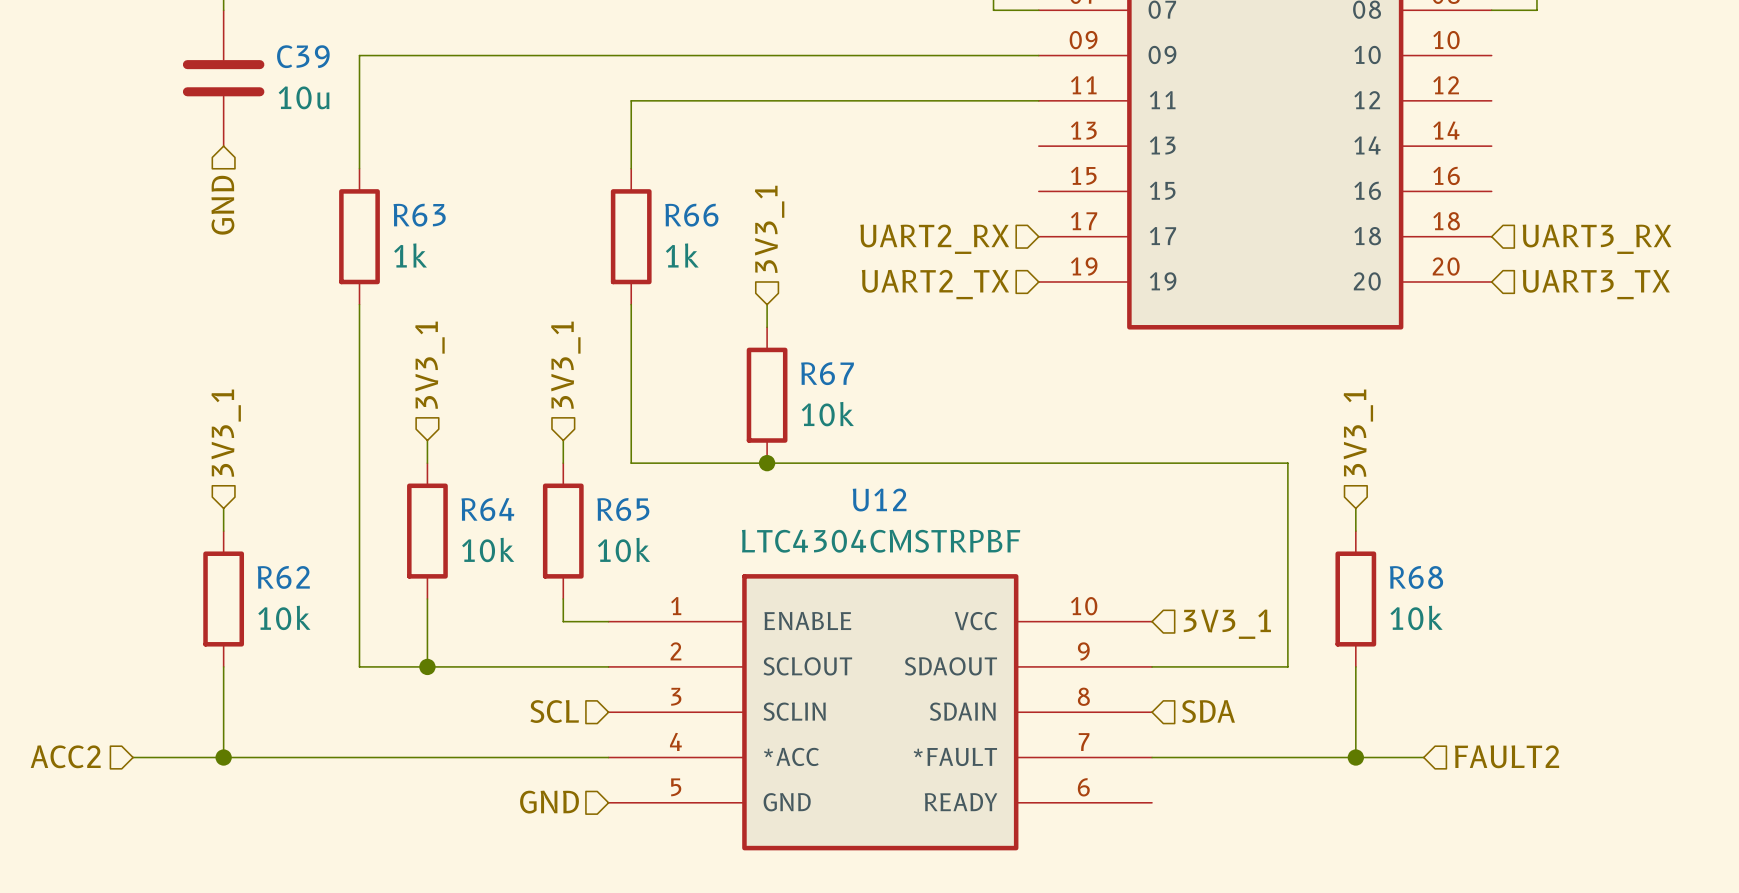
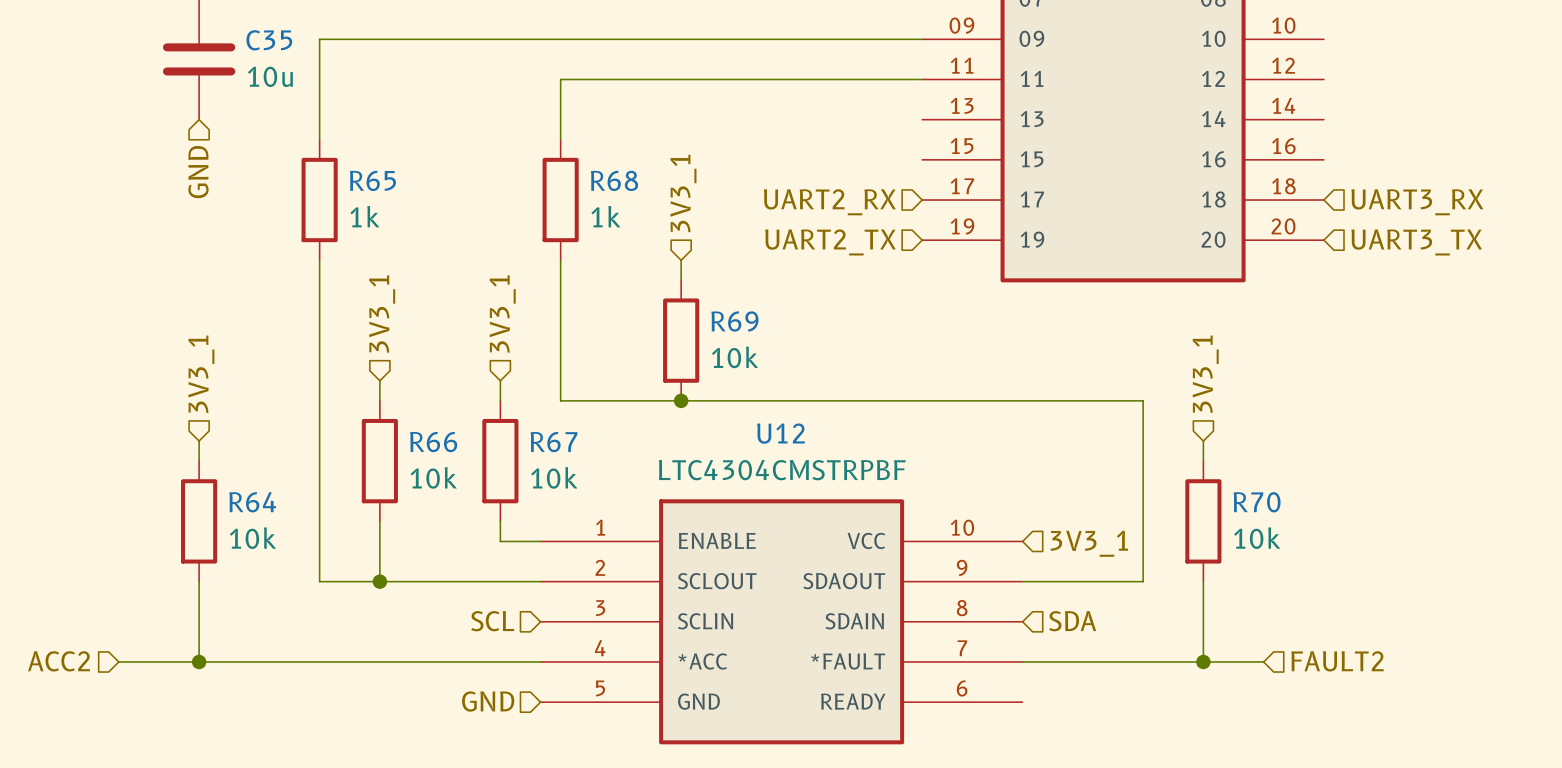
C39 name: C39 (303, 56) -> C35 (269, 40)
R63 name: R63 (419, 215) -> R65 (372, 180)
R66 name: R66 (691, 215) -> R68 (614, 180)
R67 name: R67 (827, 373) -> R69 (734, 321)
R64 name: R64 (487, 509) -> R66 (433, 442)
R65 name: R65 (623, 509) -> R67 (553, 442)
R62 name: R62 (283, 577) -> R64 (252, 502)
R68 name: R68 (1416, 577) -> R70 (1257, 502)

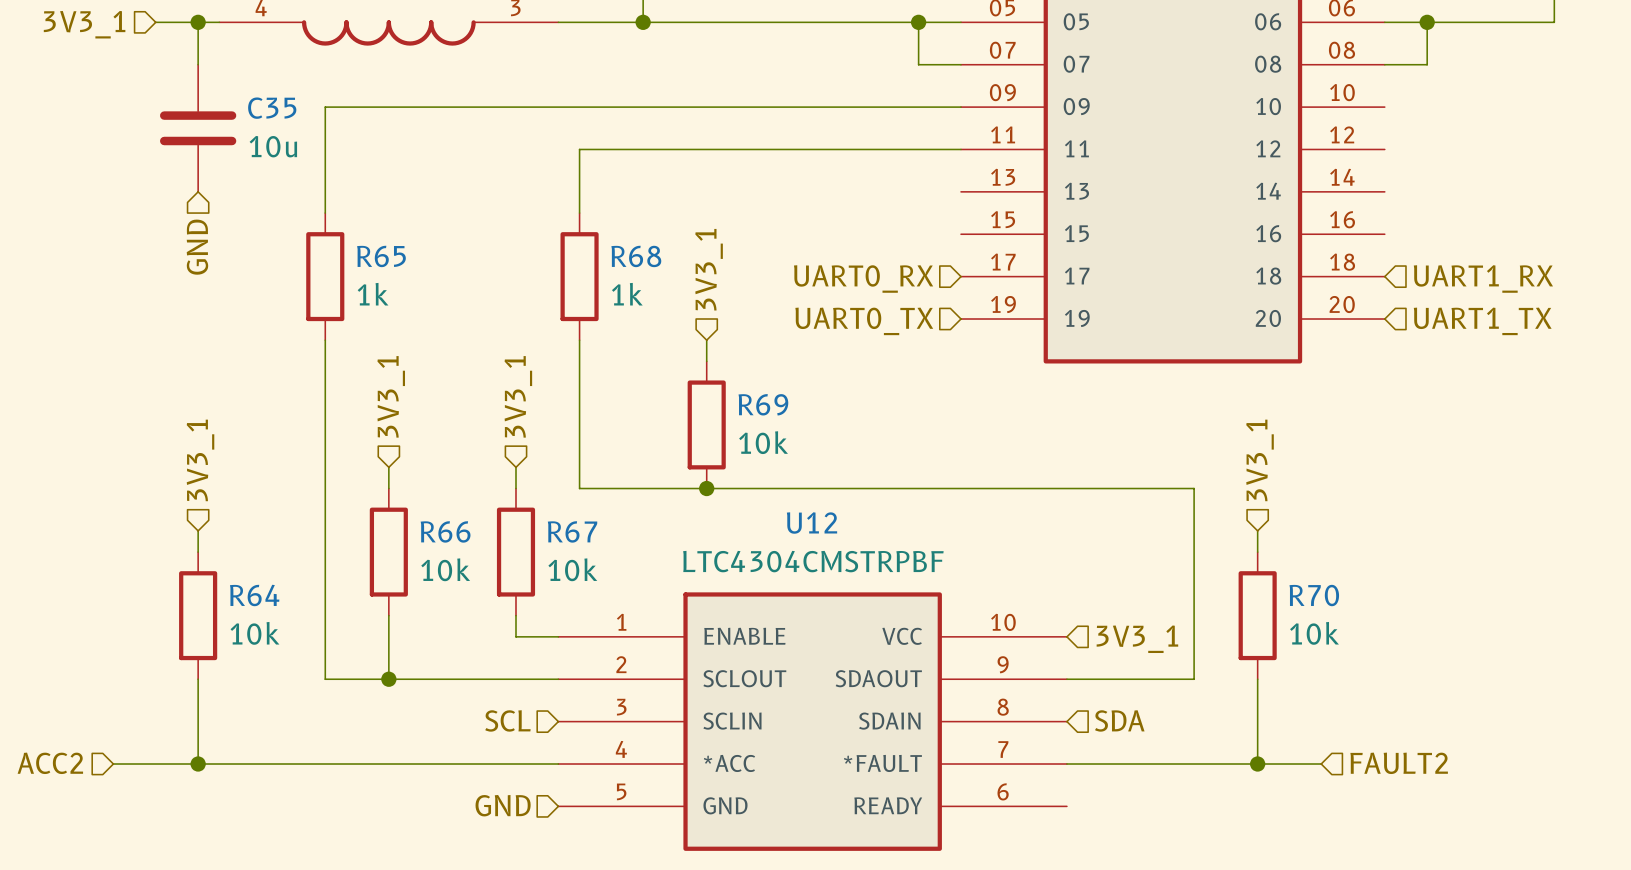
hierarchical label: UART2_RX (829, 202) -> UART0_RX (863, 279)
hierarchical label: UART3_RX (1417, 202) -> UART1_RX (1483, 279)
hierarchical label: UART2_TX (830, 242) -> UART0_TX (864, 321)
hierarchical label: UART3_TX (1416, 242) -> UART1_TX (1482, 321)

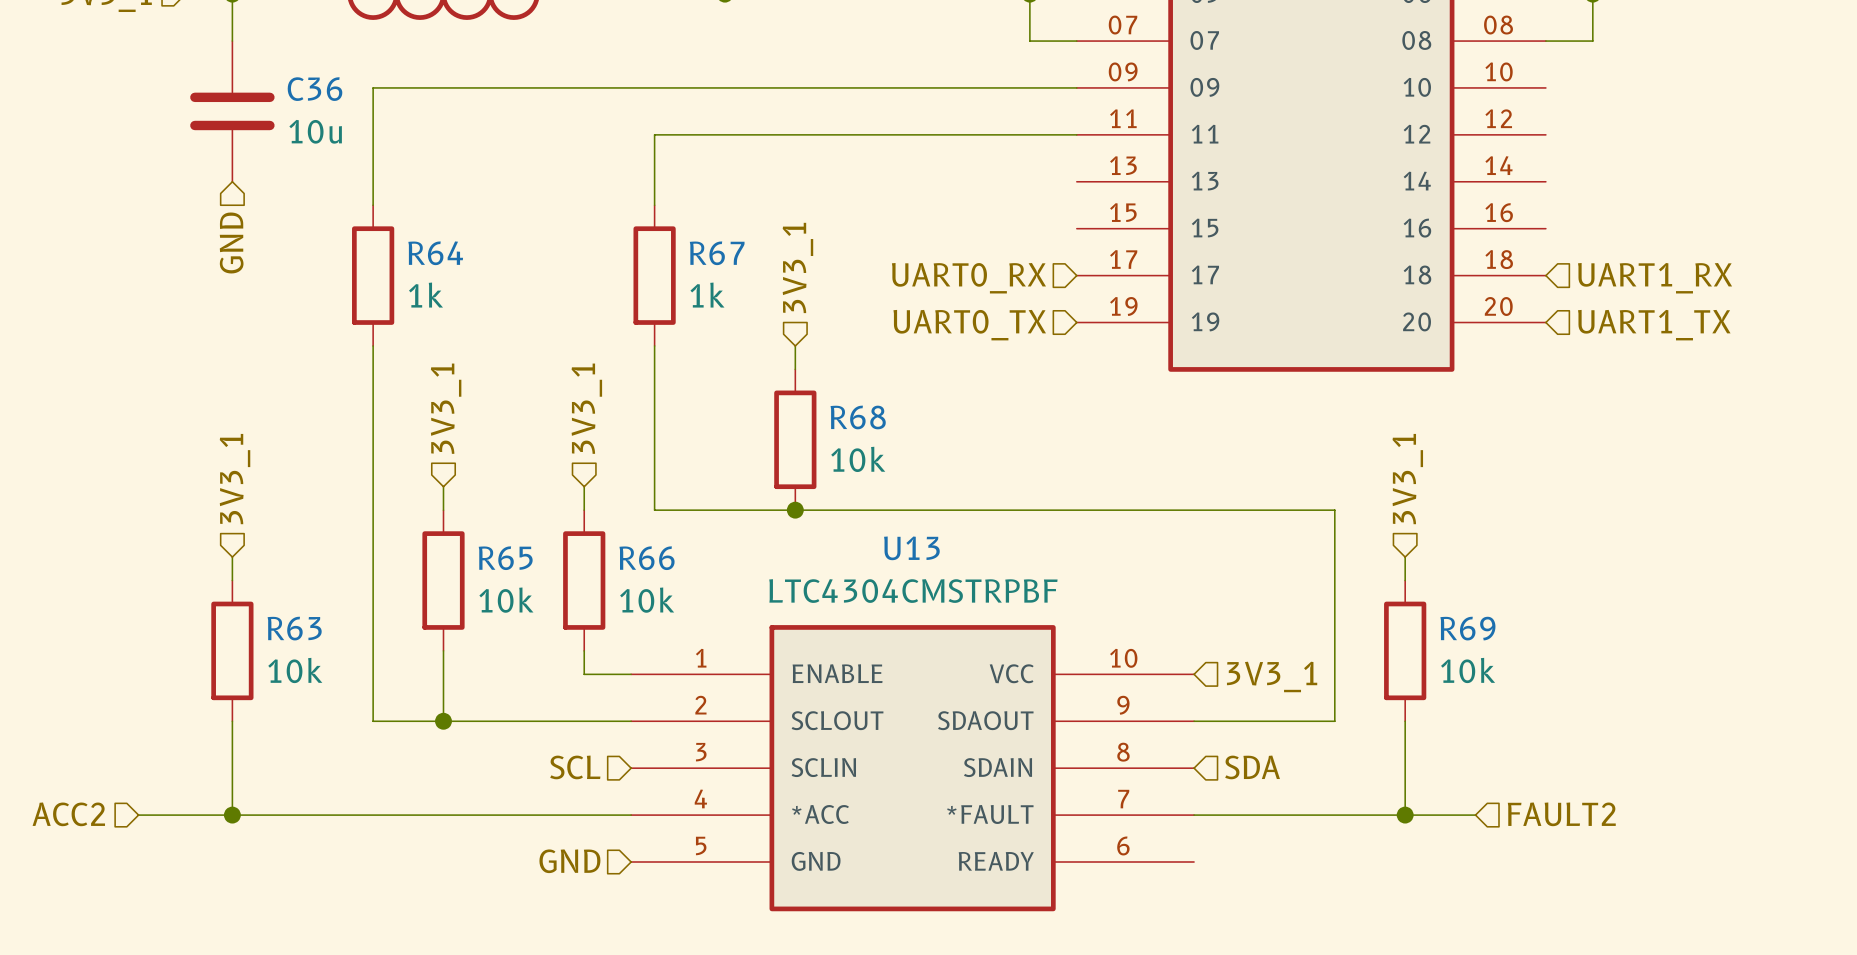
C35 name: C35 (272, 108) -> C36 (315, 89)
R65 name: R65 (381, 256) -> R64 (435, 253)
R68 name: R68 (636, 256) -> R67 (717, 253)
R69 name: R69 (763, 404) -> R68 (858, 417)
U12 name: U12 (812, 523) -> U13 (911, 548)
R66 name: R66 (445, 531) -> R65 (505, 558)
R67 name: R67 (572, 531) -> R66 (647, 558)
R64 name: R64 (254, 595) -> R63 (294, 628)
R70 name: R70 (1314, 595) -> R69 (1467, 628)

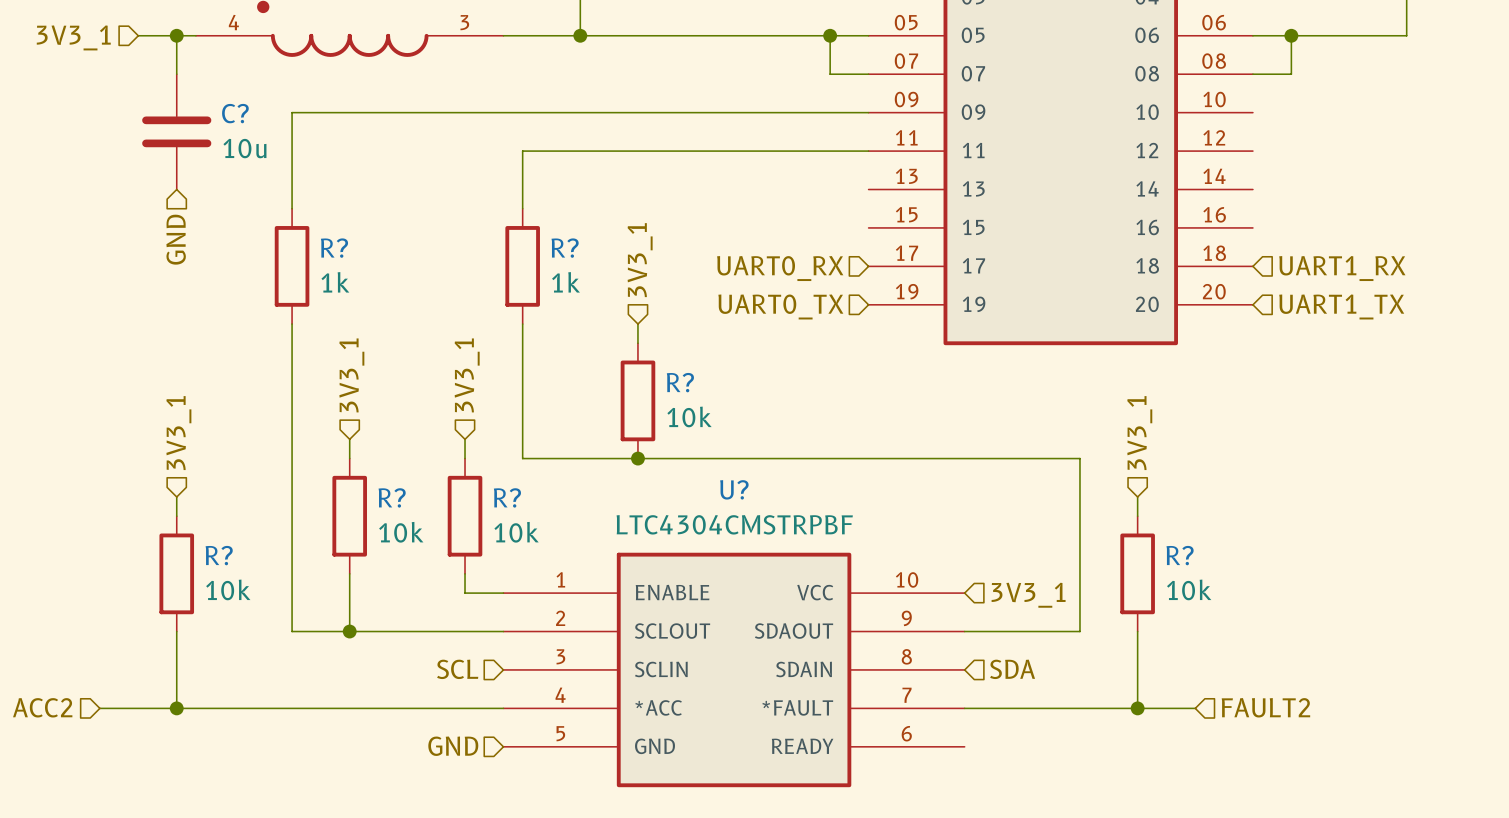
C36 name: C36 (315, 89) -> C? (235, 113)
R64 name: R64 (435, 253) -> R? (334, 248)
R67 name: R67 (717, 253) -> R? (565, 248)
R68 name: R68 (858, 417) -> R? (680, 382)
U13 name: U13 (911, 548) -> U? (734, 489)
R65 name: R65 (505, 558) -> R? (392, 497)
R66 name: R66 (647, 558) -> R? (507, 497)
R63 name: R63 (294, 628) -> R? (219, 555)
R69 name: R69 (1467, 628) -> R? (1180, 555)

